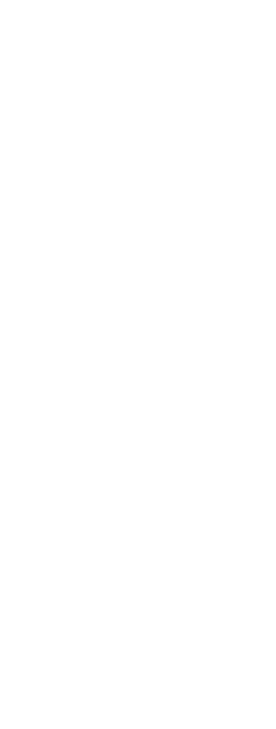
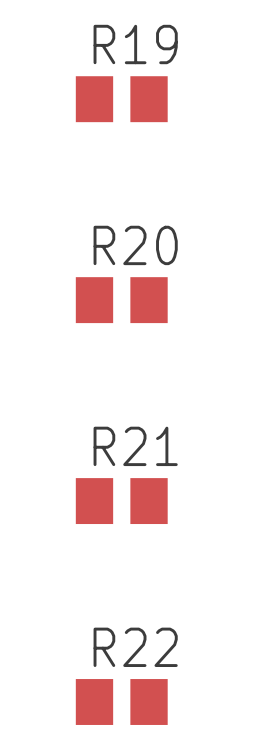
R19: none -> (121, 99)
R20: none -> (121, 300)
R21: none -> (121, 501)
R22: none -> (121, 702)

